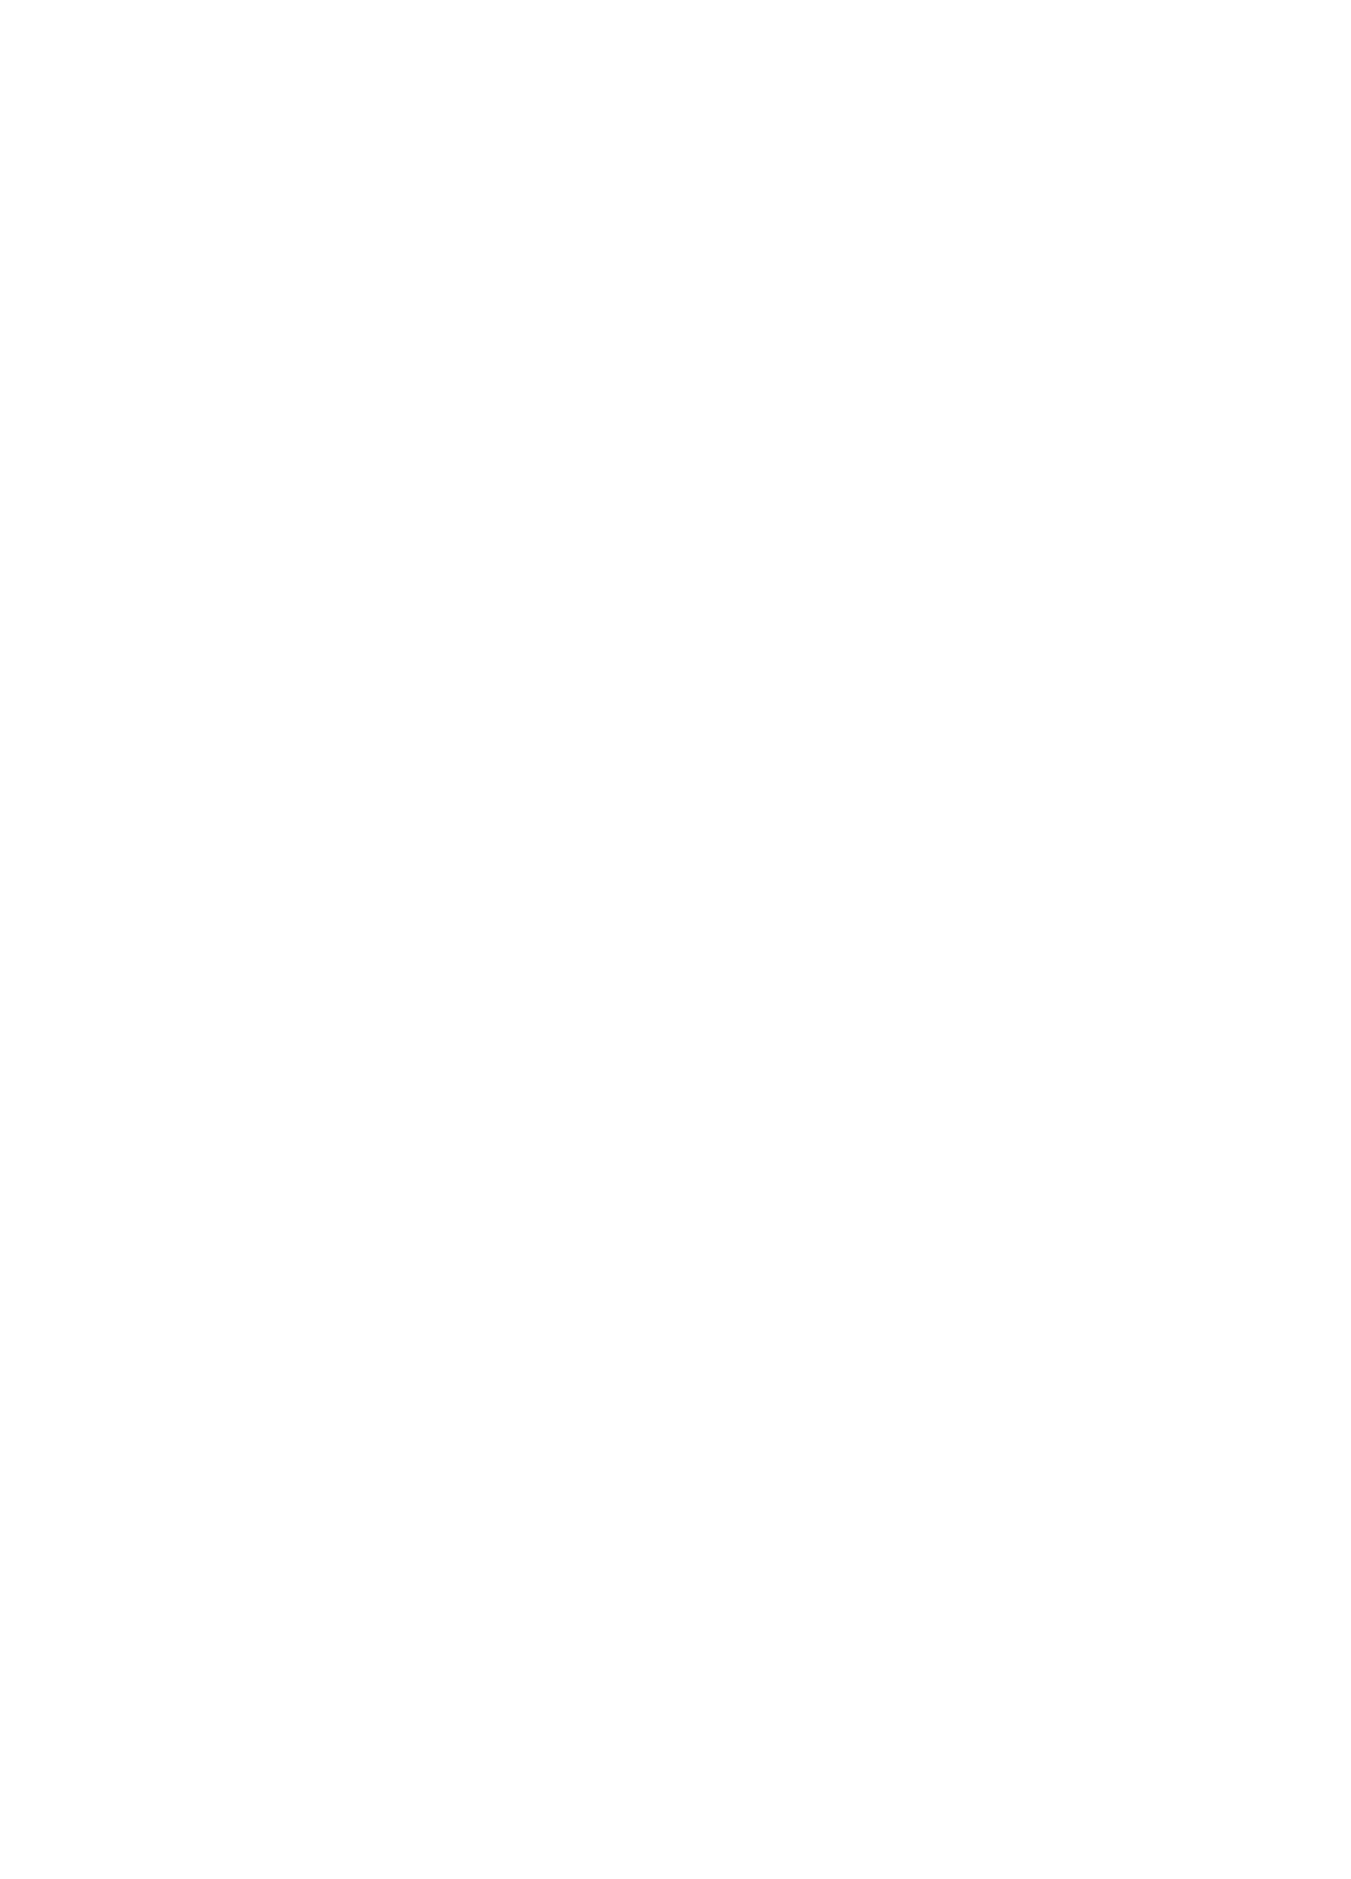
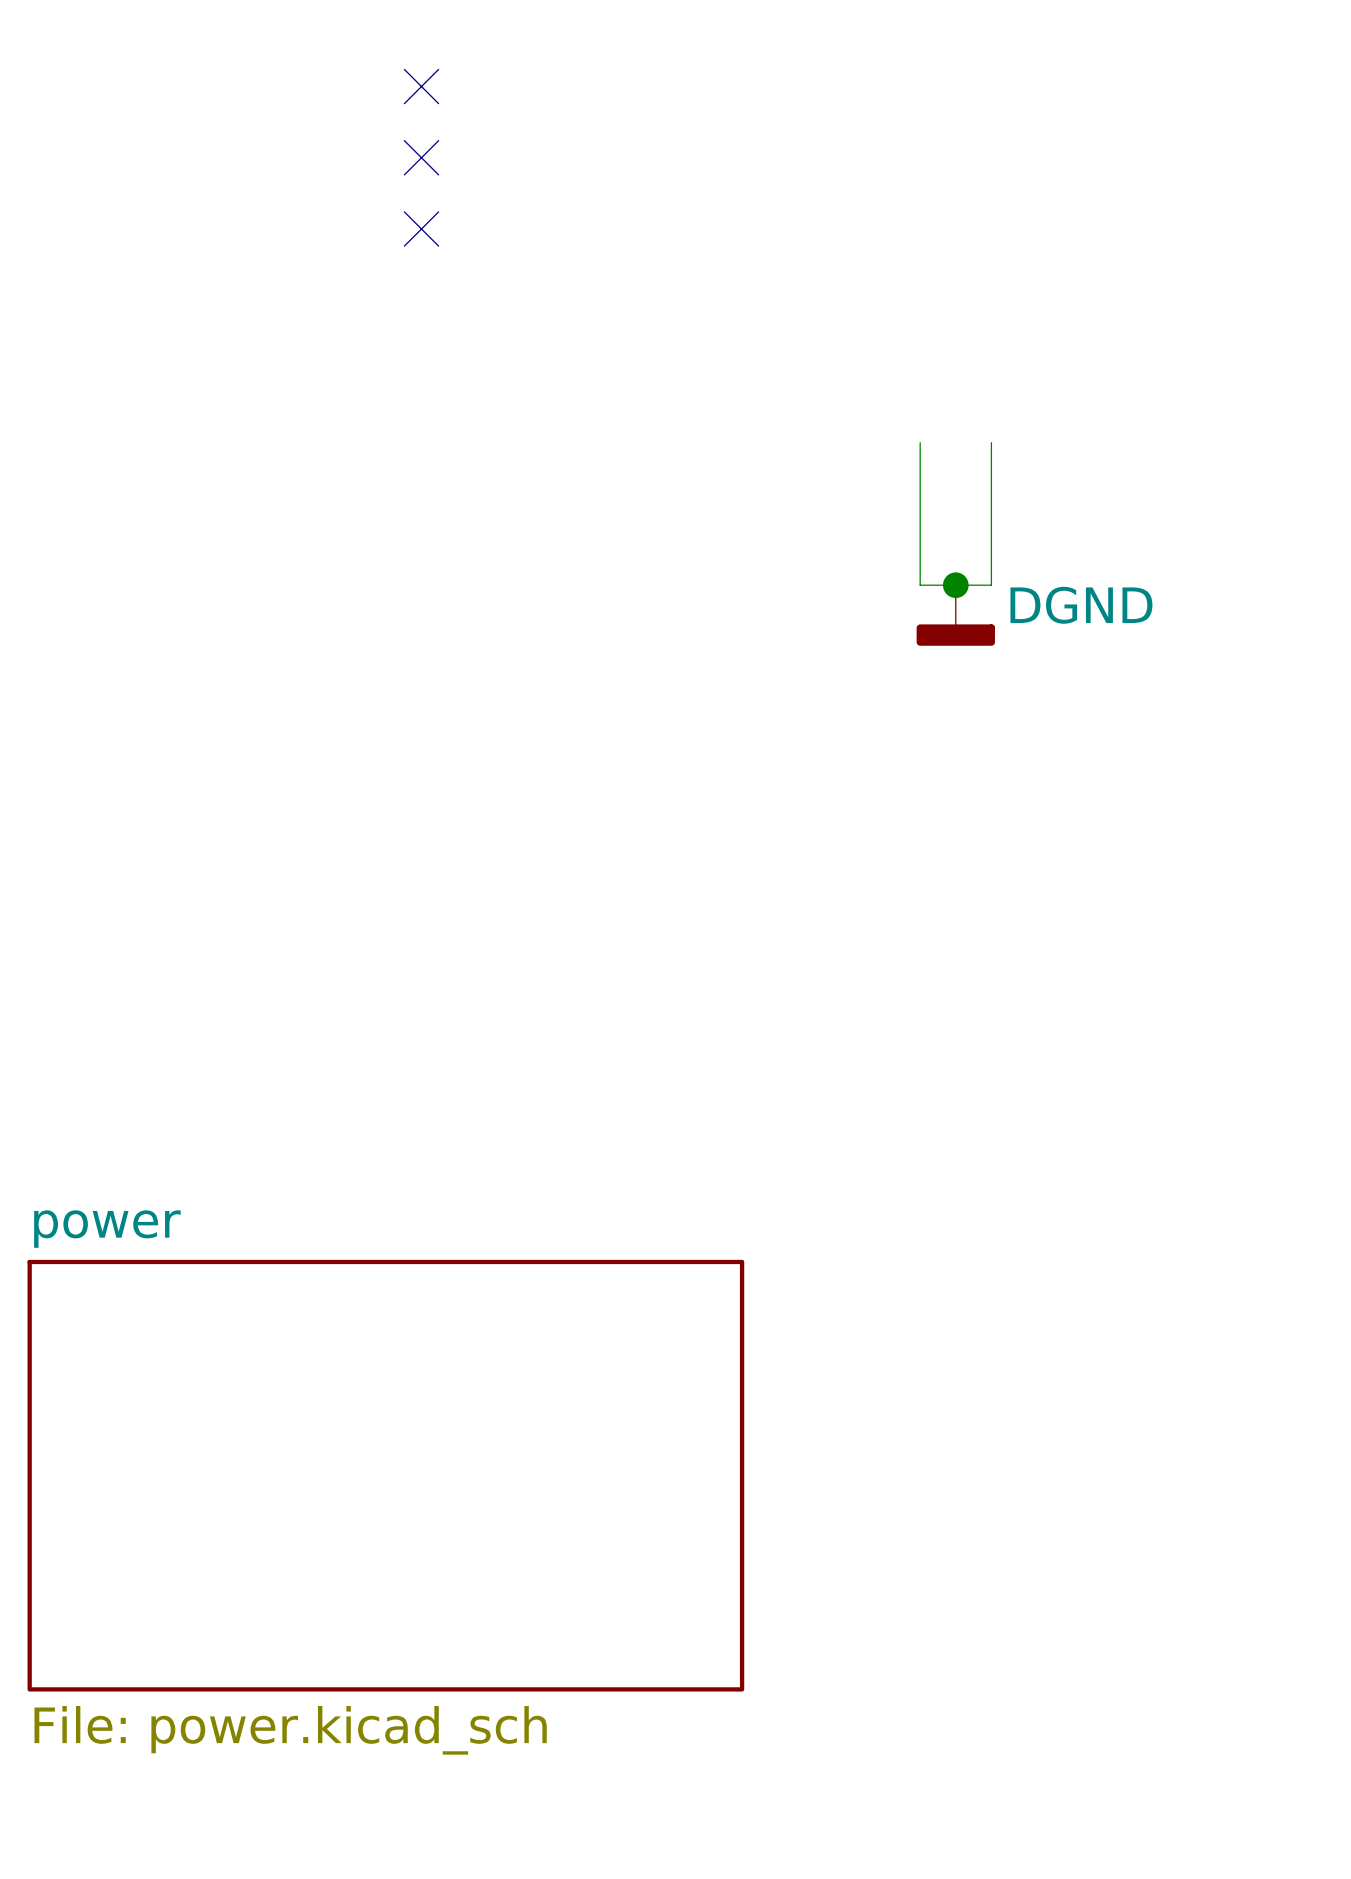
no-connect mark: none -> (421, 86)
no-connect mark: none -> (421, 157)
no-connect mark: none -> (421, 229)
wire: none -> (920, 442) (920, 585) (991, 585) (991, 442)
junction: none -> (955, 585)
power symbol: none -> DGND (955, 615)
sheet power: none -> File: power.kicad_sch (385, 1475)

